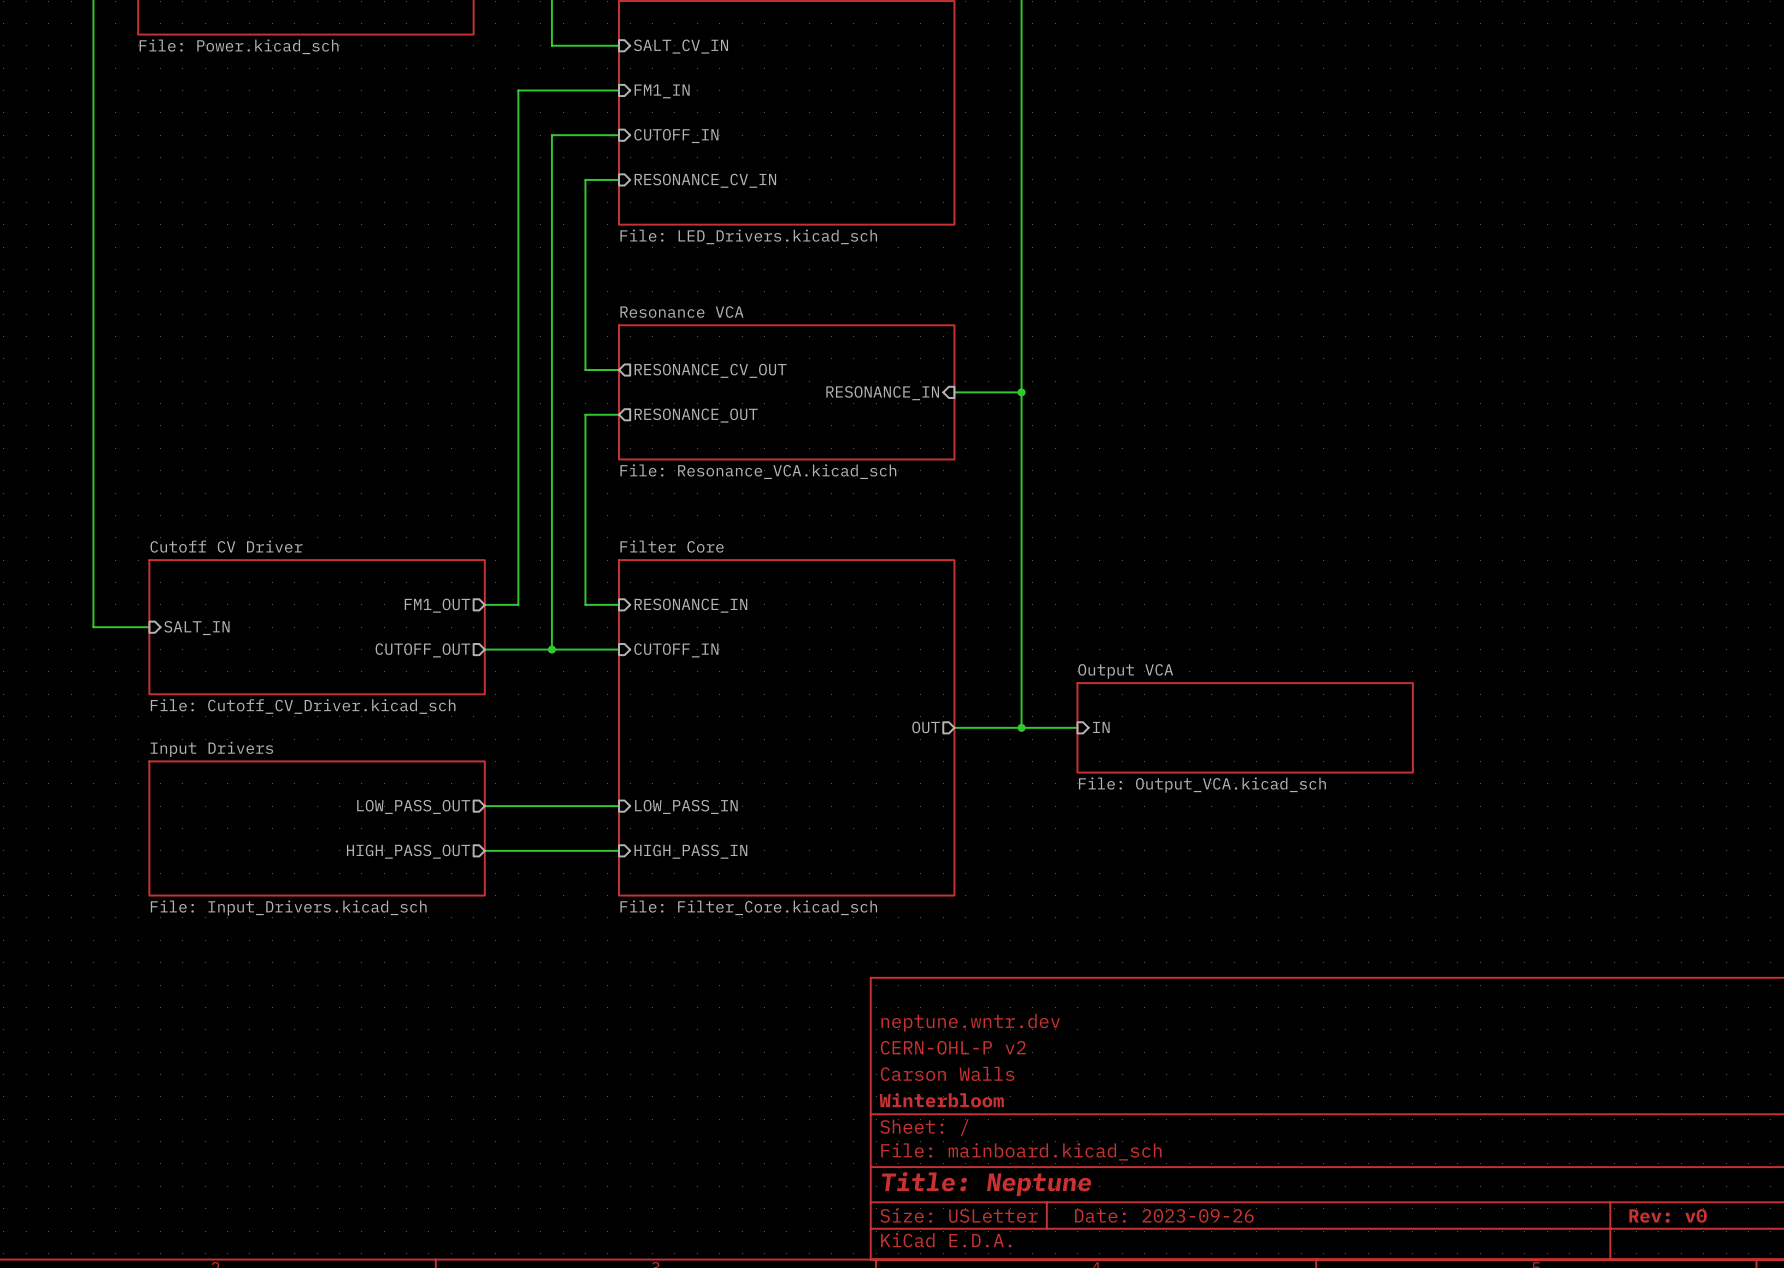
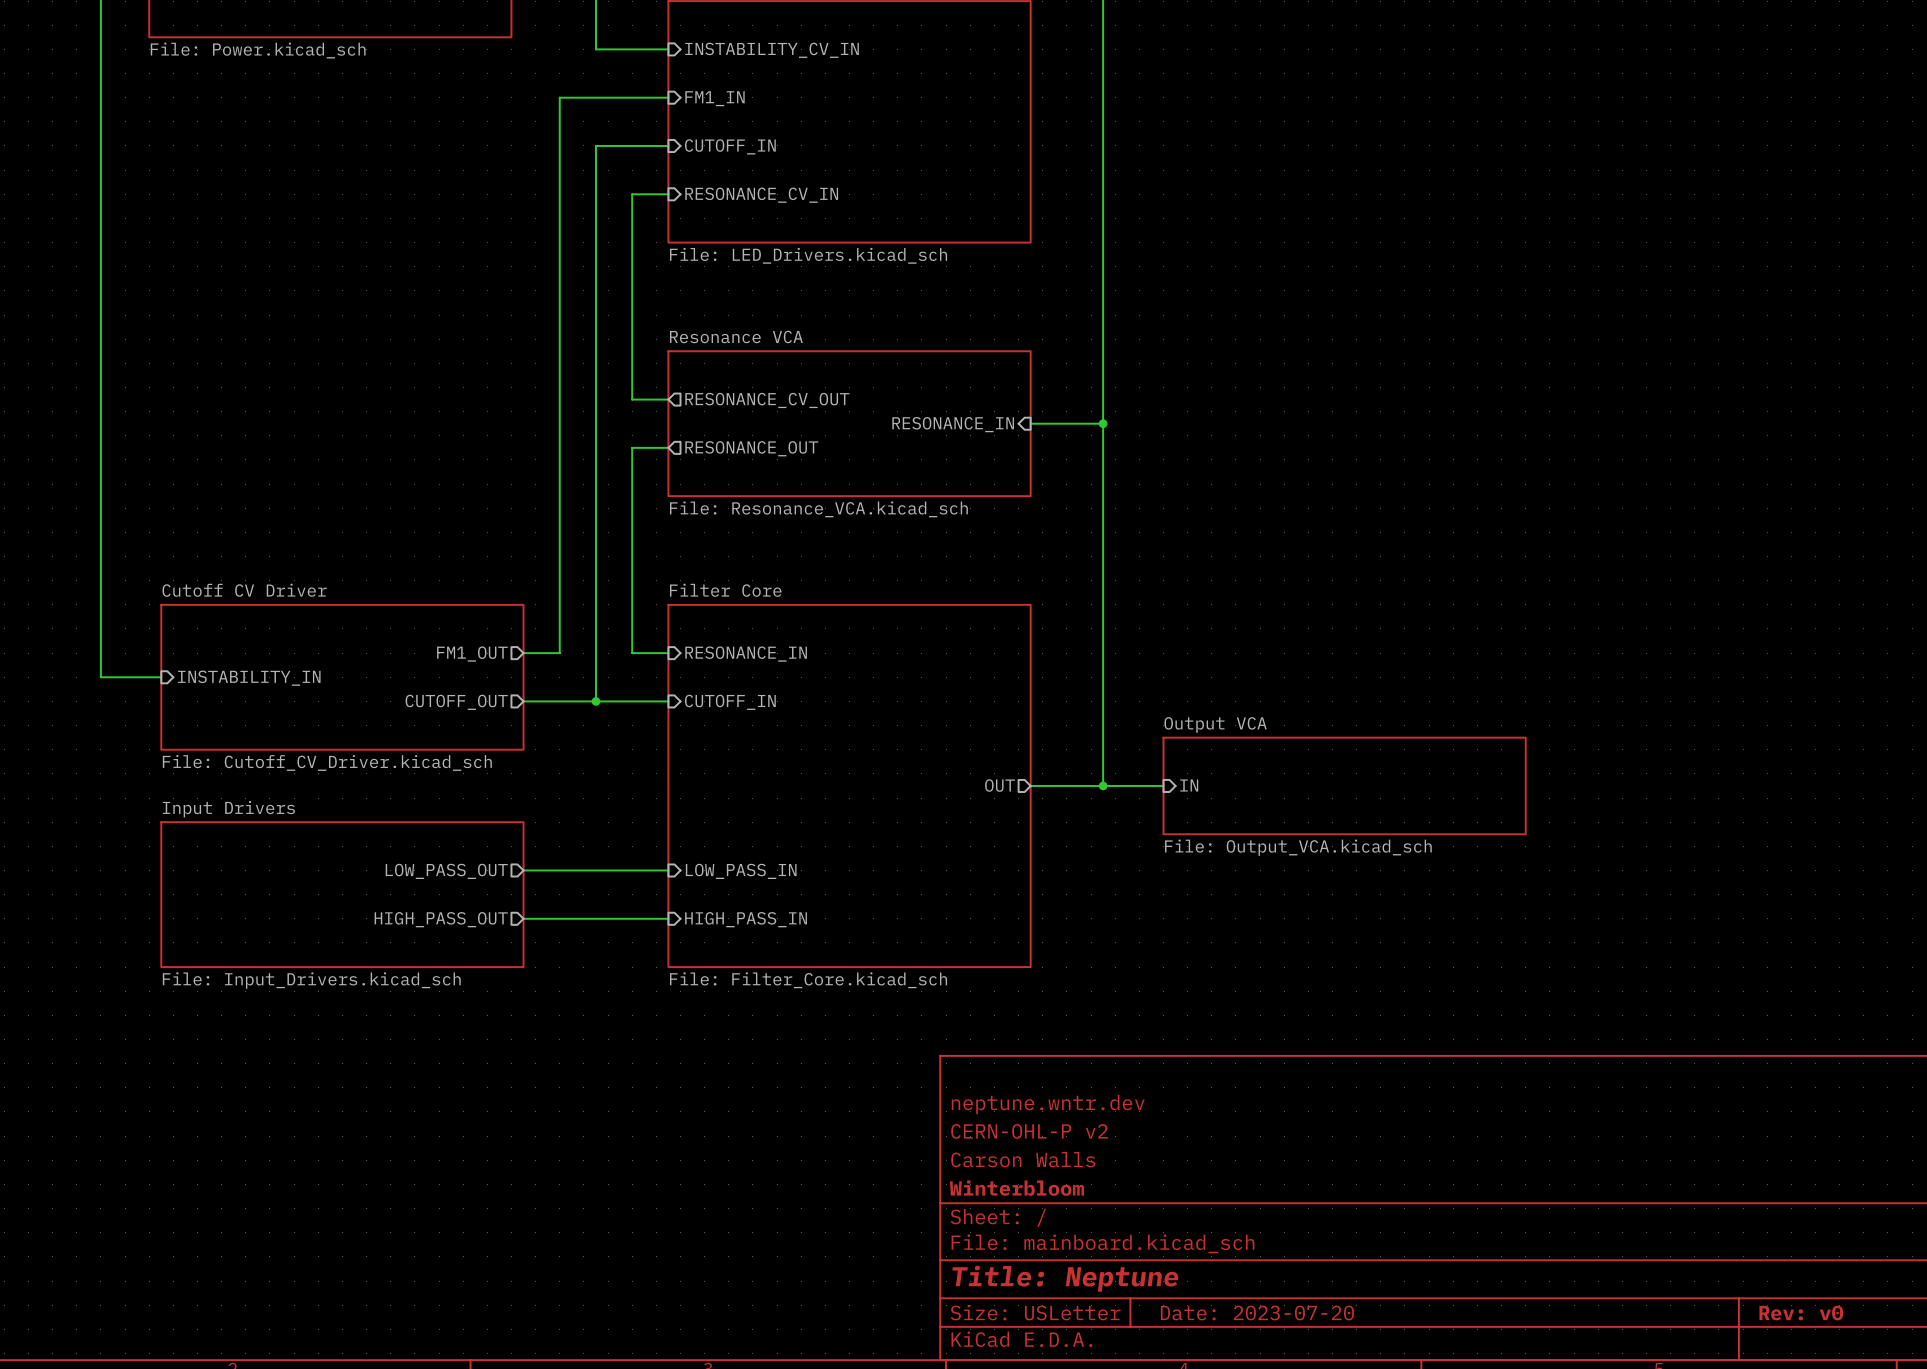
sheet pin: SALT_CV_IN (680, 46) -> INSTABILITY_CV_IN (772, 50)
sheet pin: SALT_IN (196, 628) -> INSTABILITY_IN (249, 678)
title block: Date: 2023-09-26 (1164, 1215) -> Date: 2023-07-20 (1257, 1313)

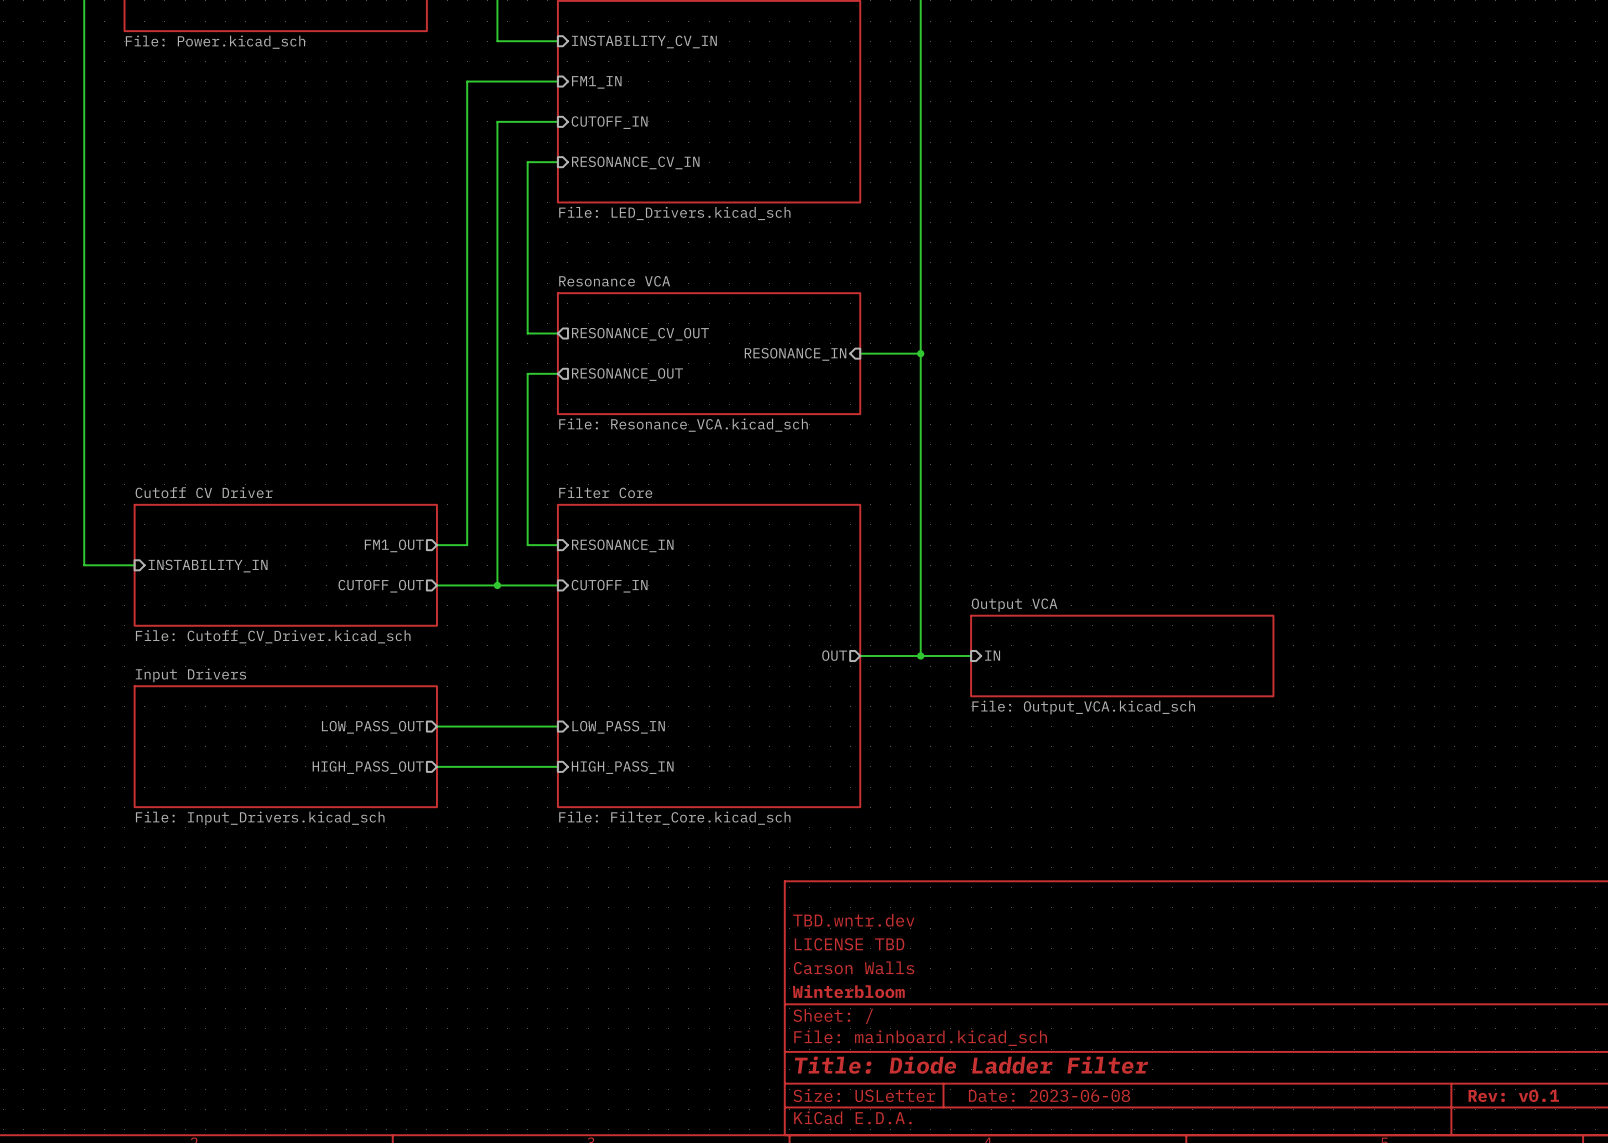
title block: neptune.wntr.dev (1048, 1104) -> TBD.wntr.dev (853, 920)
title block: CERN-OHL-P v2 (1029, 1131) -> LICENSE TBD (849, 944)
title block: Title: Neptune (1065, 1278) -> Title: Diode Ladder Filter (971, 1065)
title block: Date: 2023-07-20 (1257, 1313) -> Date: 2023-06-08 (1049, 1095)
title block: Rev: v0 (1801, 1313) -> Rev: v0.1 (1513, 1095)

